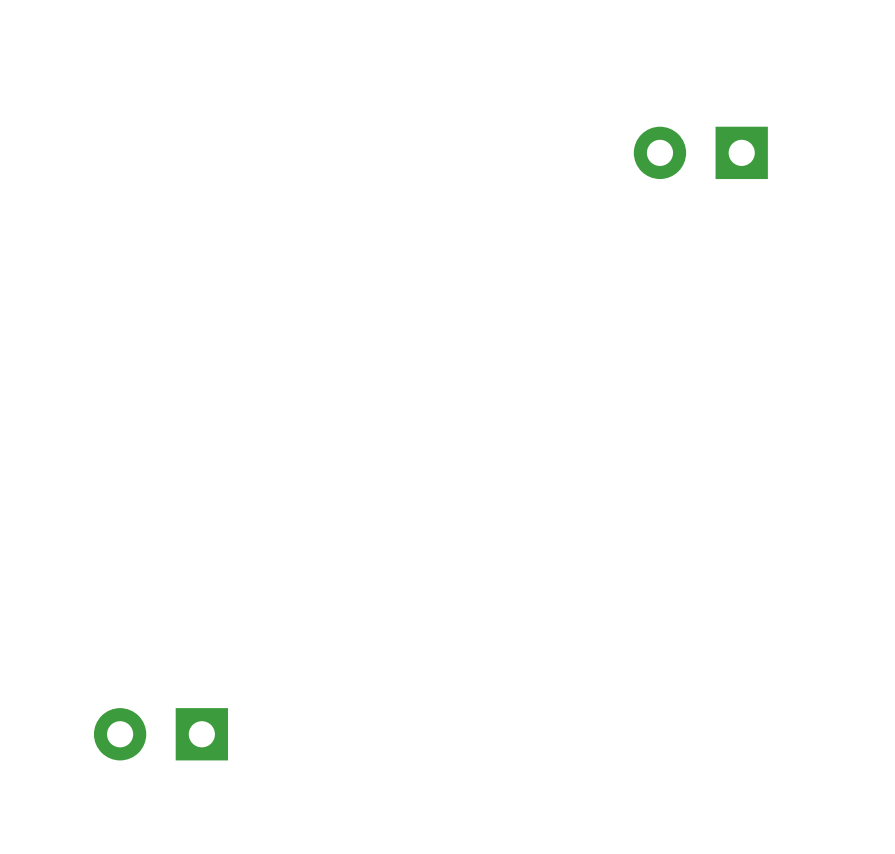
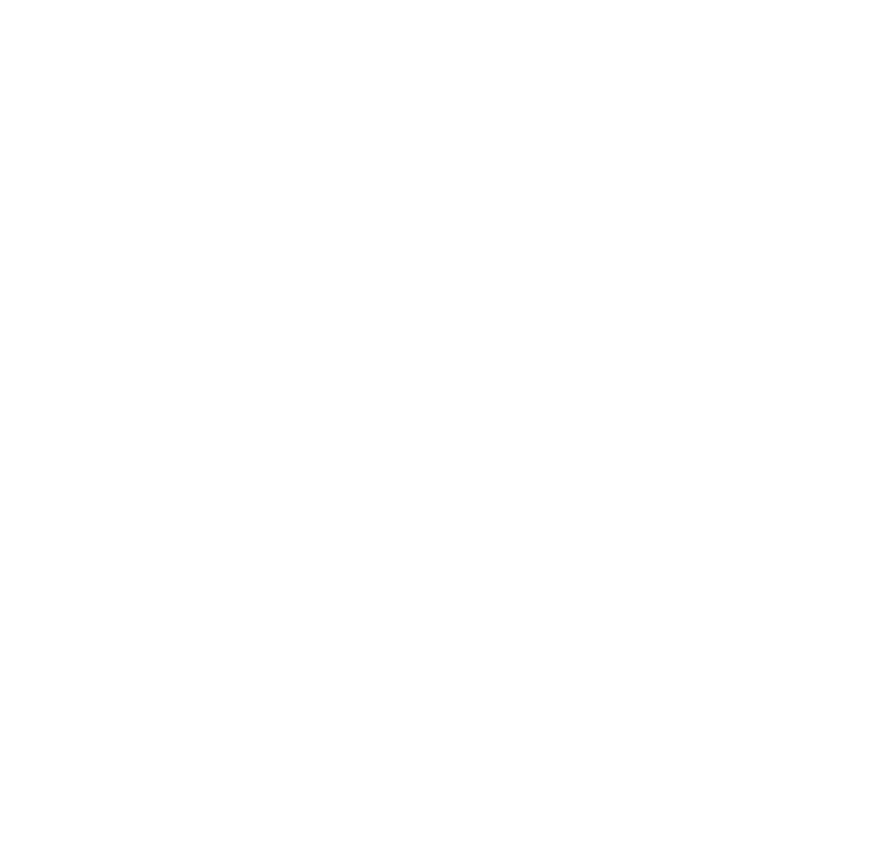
part: (700, 152) -> none
part: (160, 734) -> none

